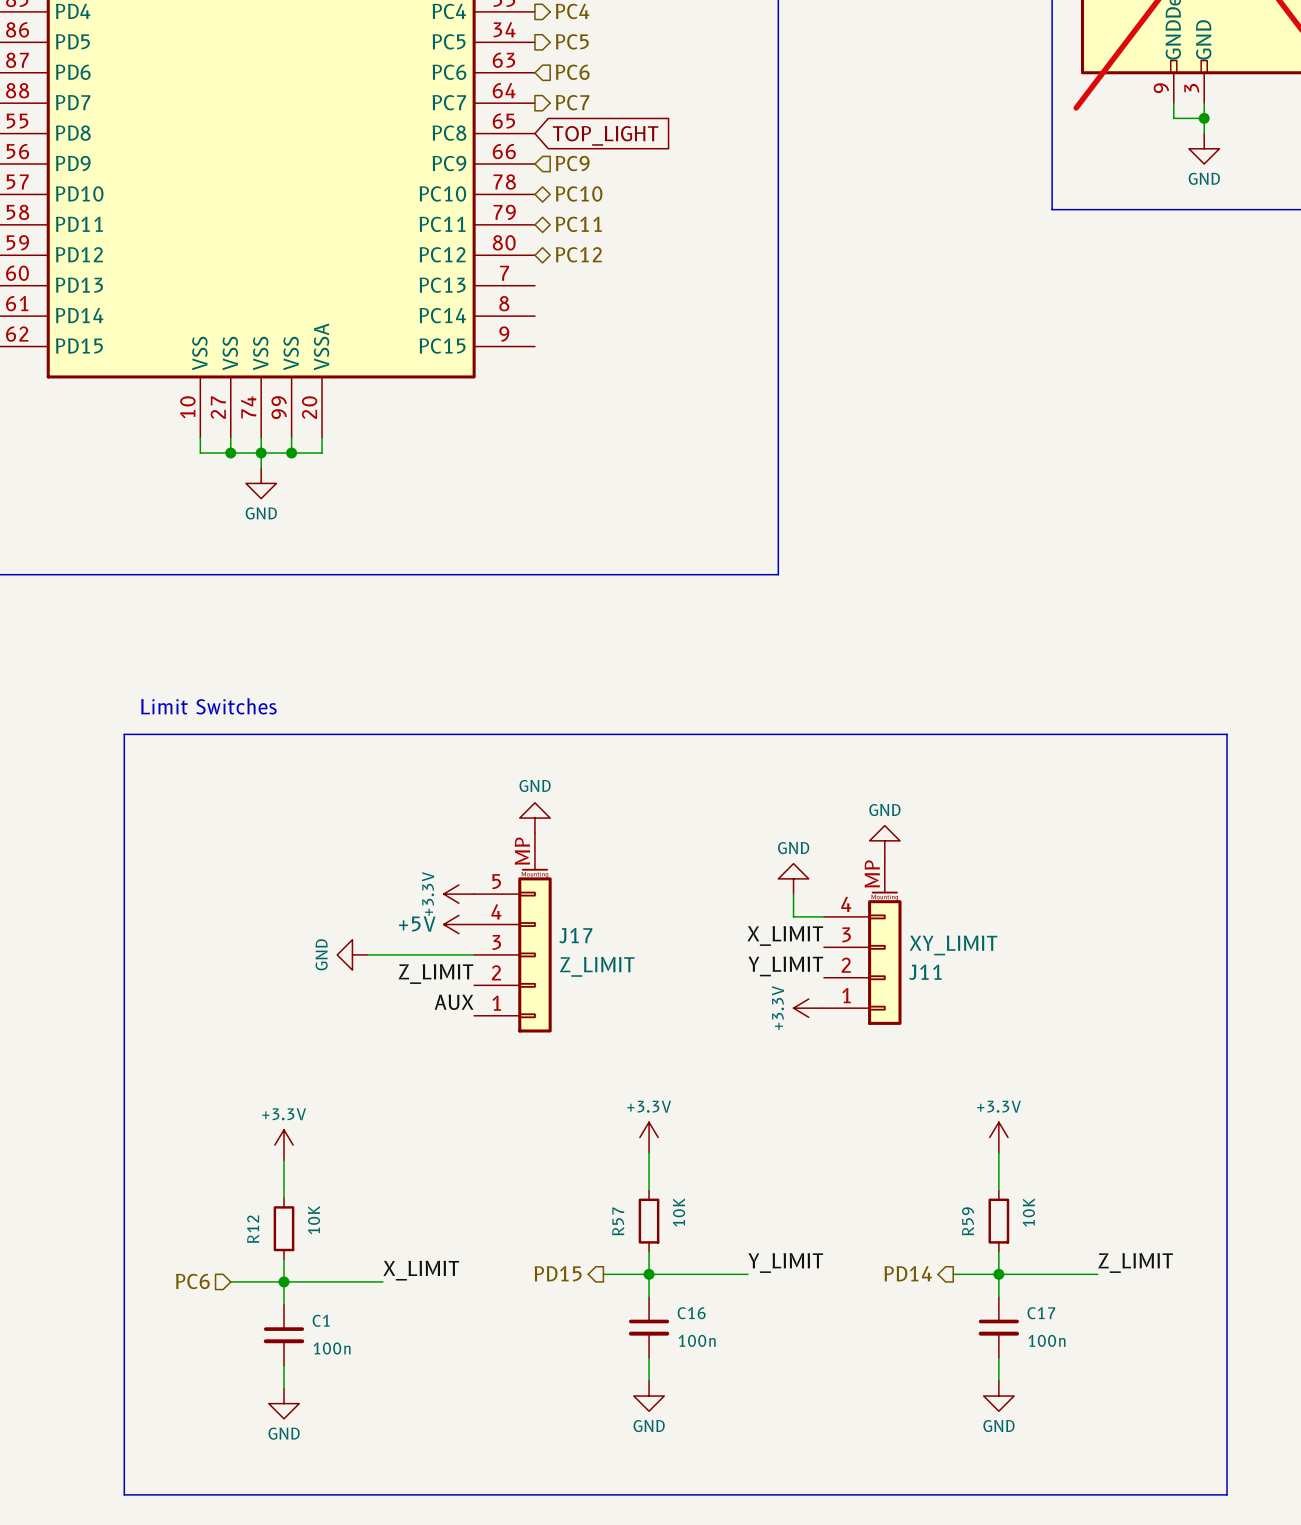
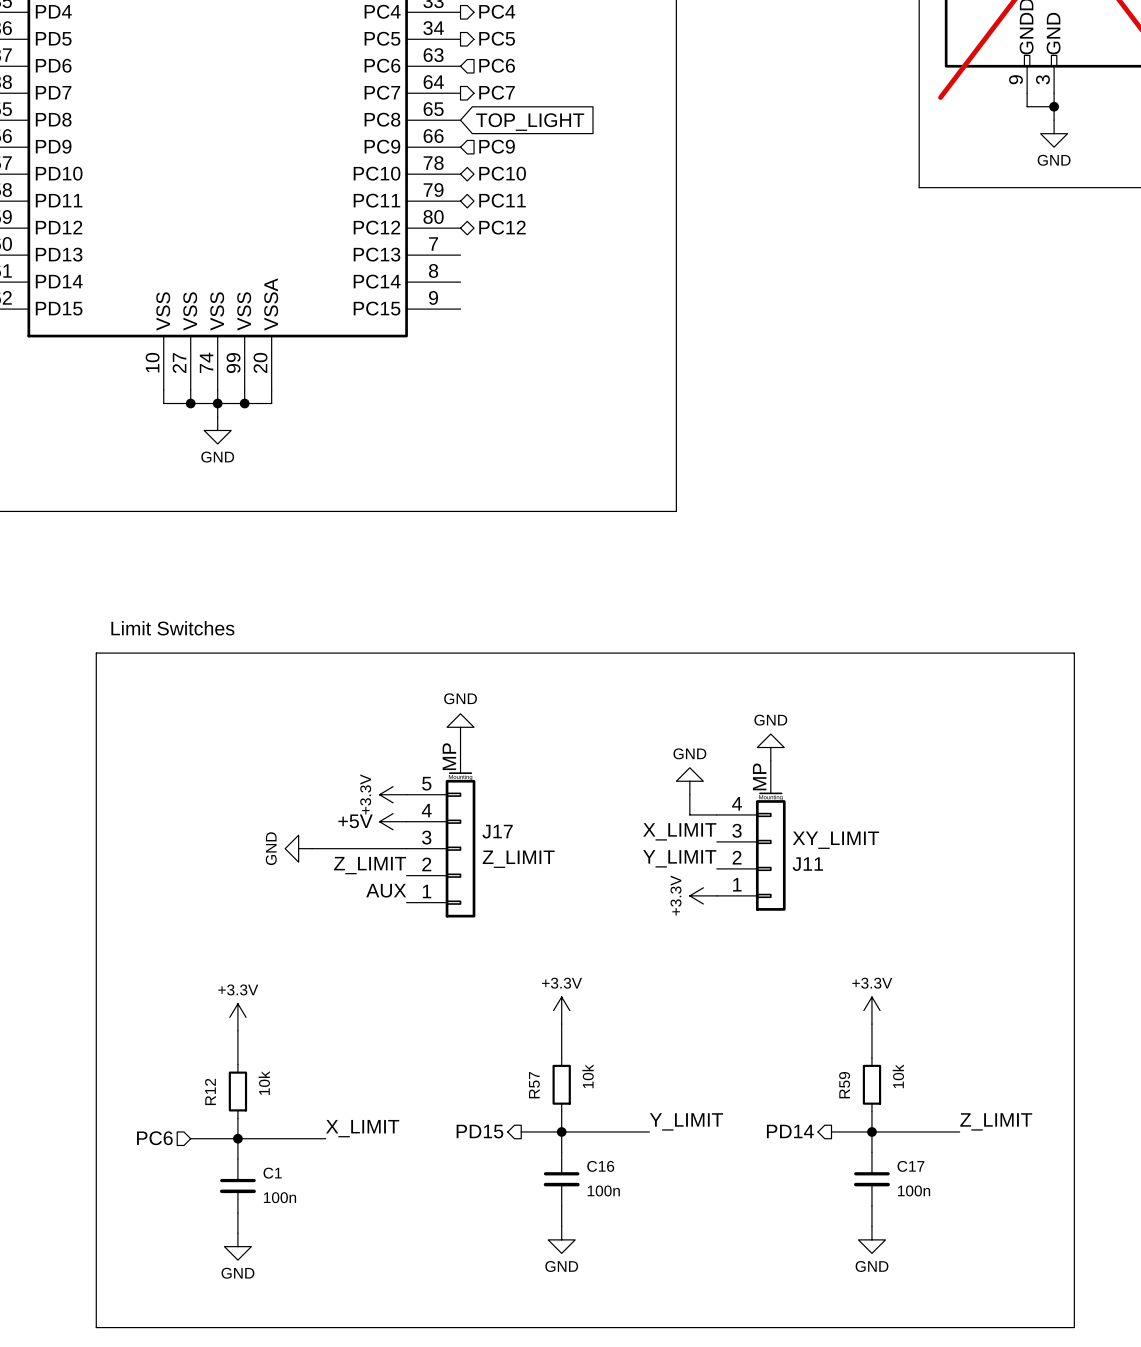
R57 value: 10K (679, 1212) -> 10k (588, 1076)
R59 value: 10K (1028, 1212) -> 10k (898, 1076)
R12 value: 10K (314, 1220) -> 10k (264, 1083)

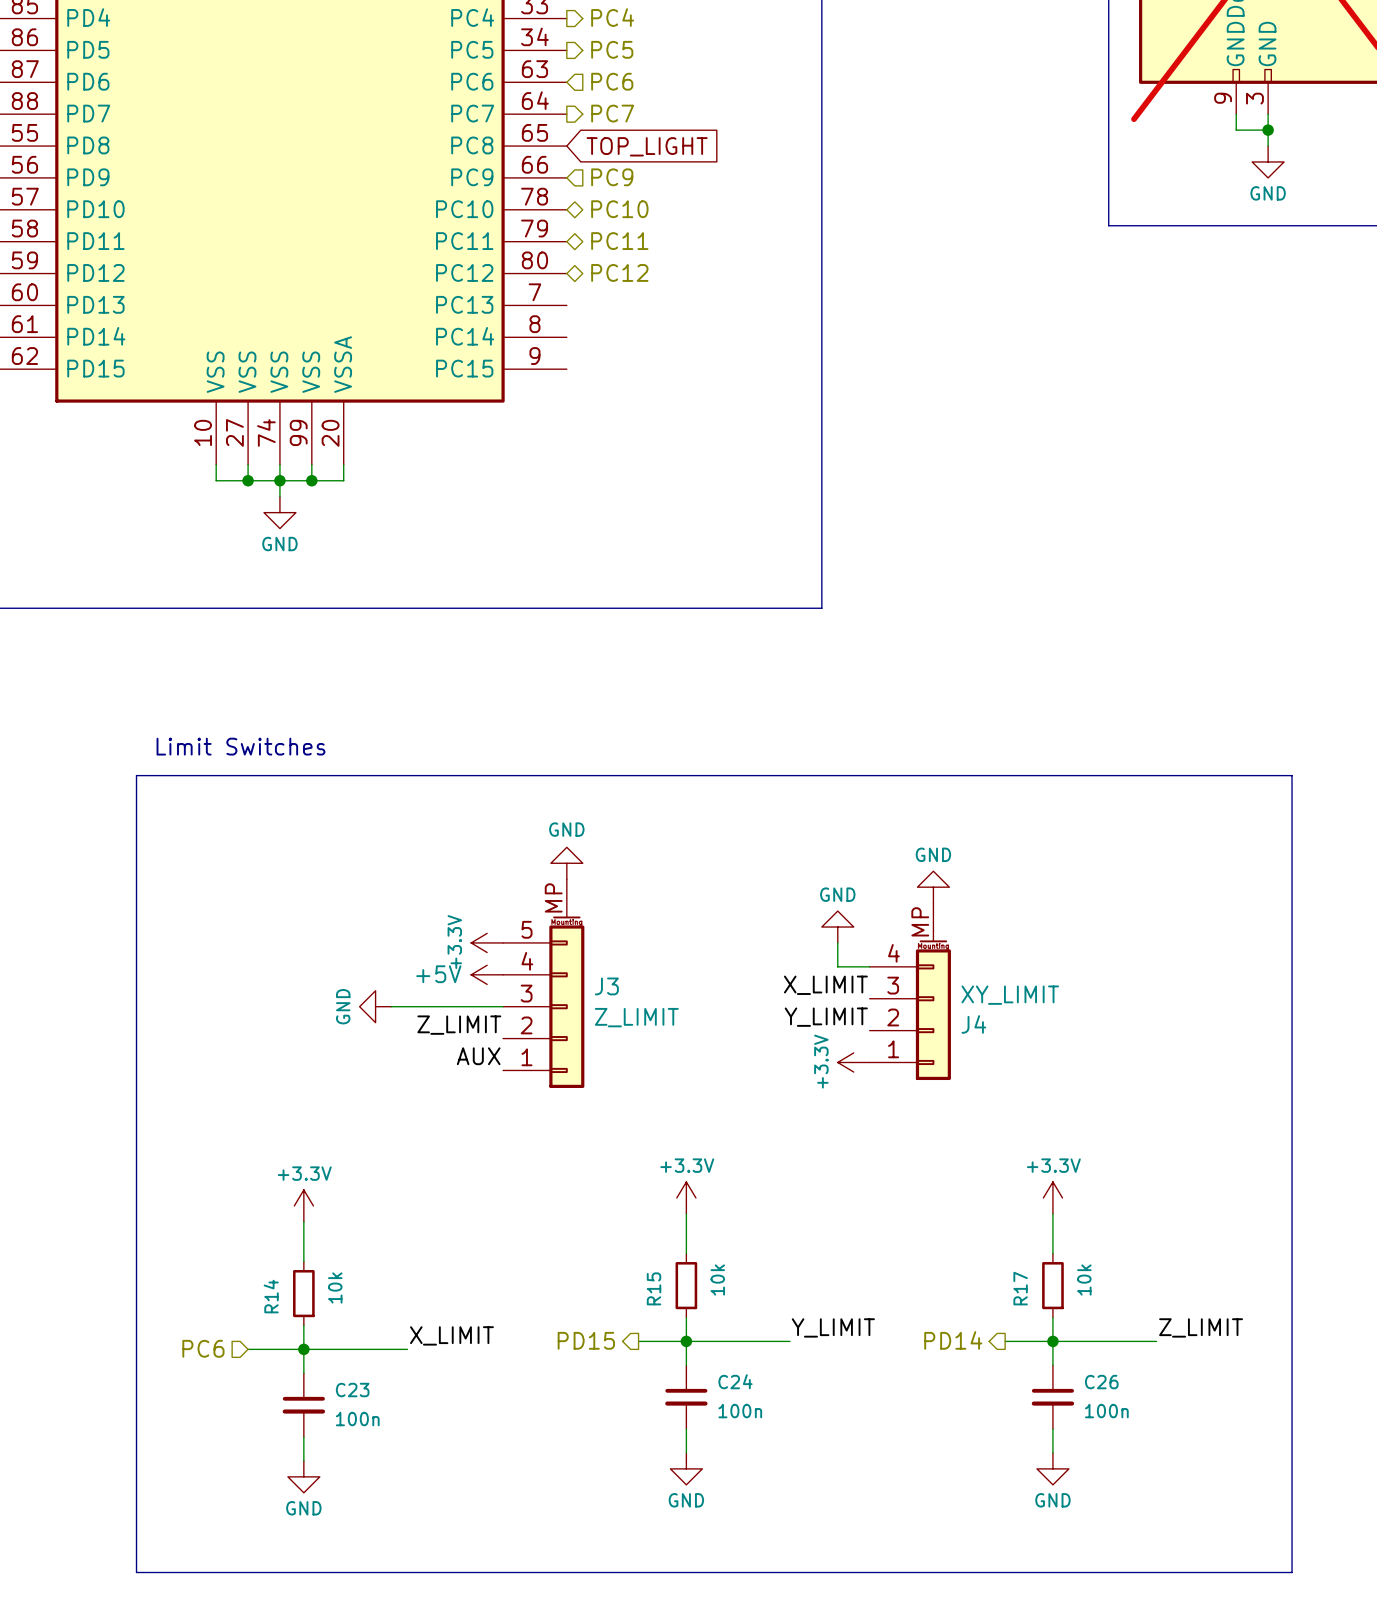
J17 name: J17 (497, 831) -> J3 (606, 986)
J11 name: J11 (807, 864) -> J4 (973, 1024)
R57 name: R57 (534, 1085) -> R15 (654, 1288)
R59 name: R59 (844, 1085) -> R17 (1020, 1288)
R12 name: R12 (210, 1091) -> R14 (271, 1296)
C16 name: C16 (600, 1166) -> C24 (735, 1381)
C17 name: C17 (910, 1166) -> C26 (1101, 1382)
C1 name: C1 (272, 1173) -> C23 (352, 1390)

